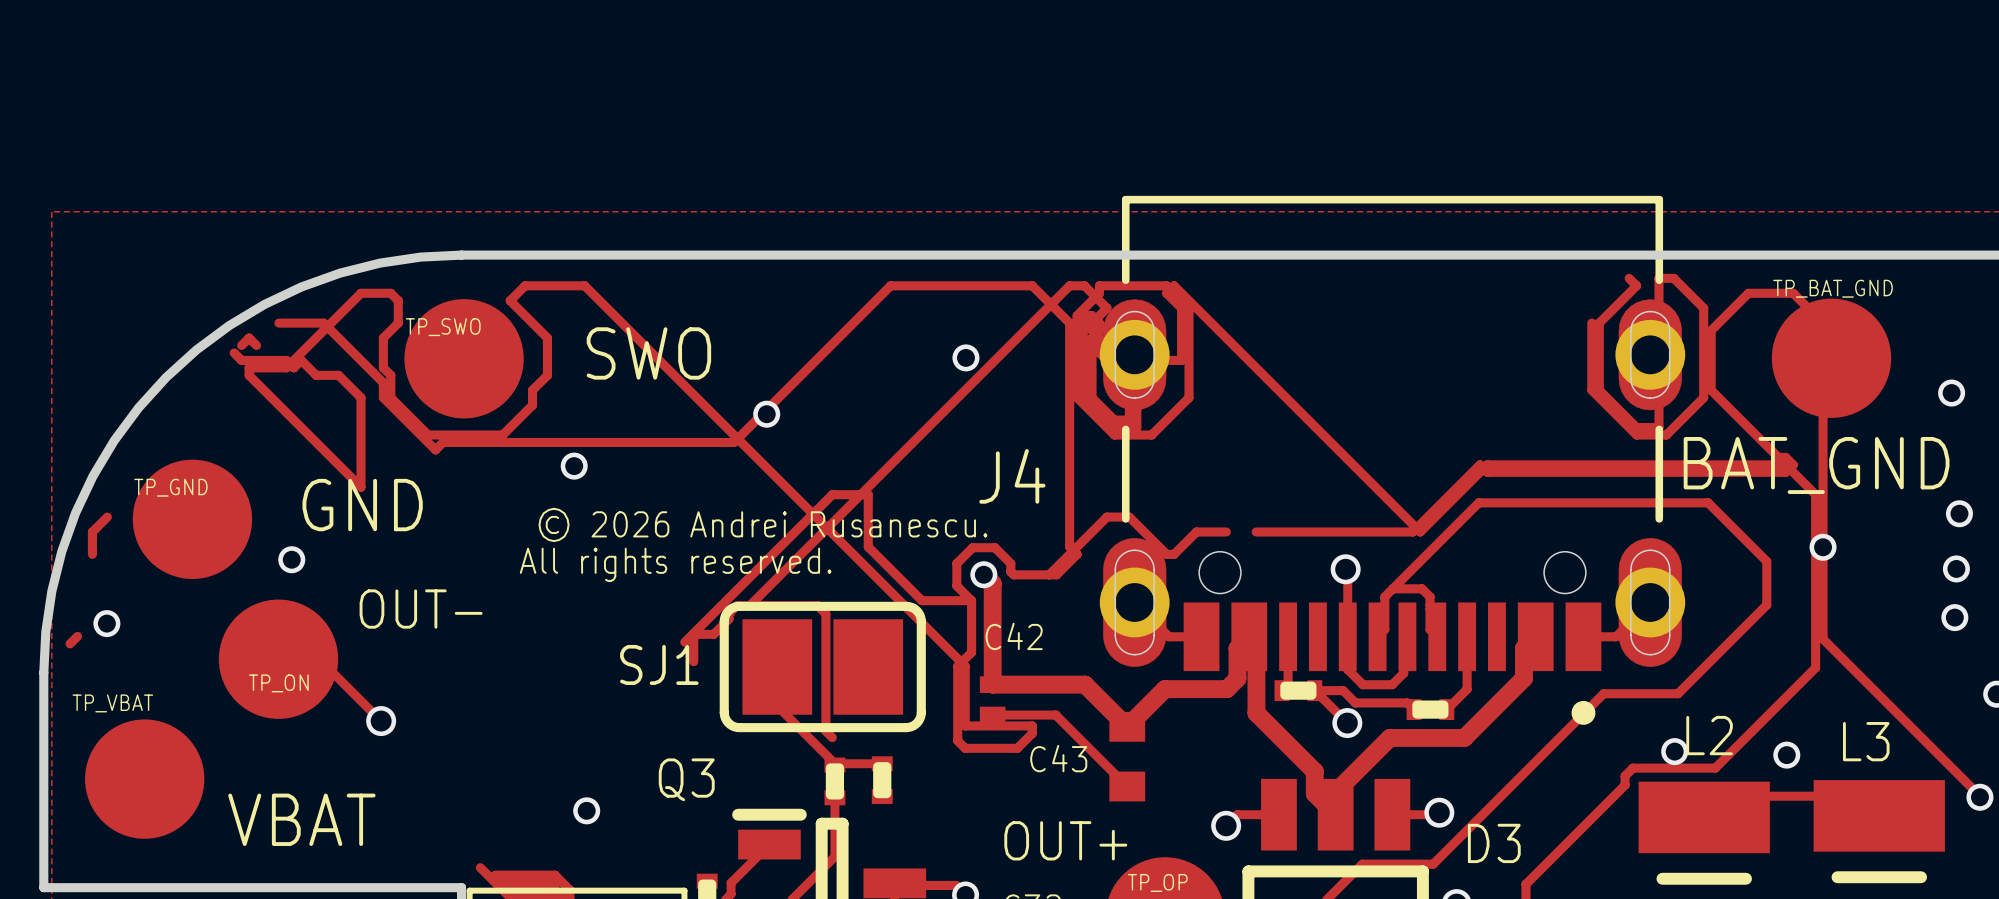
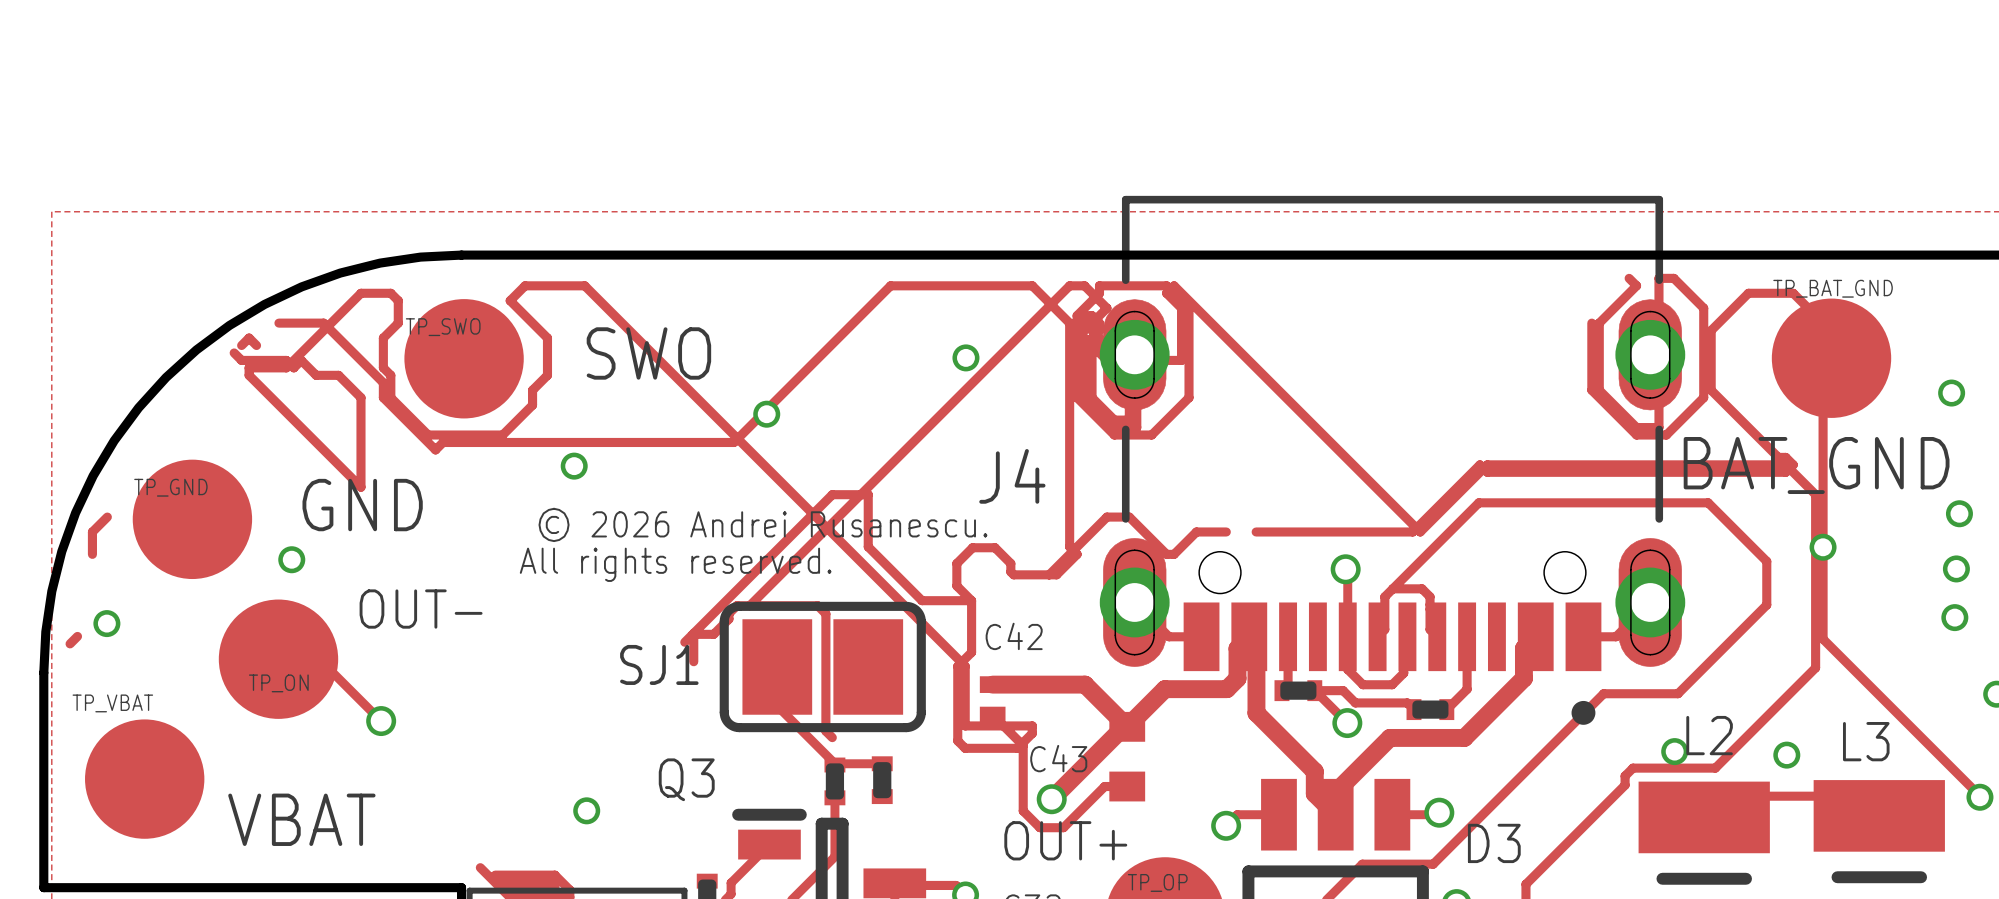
track: (983, 574) (992, 583) (992, 684) -> none
via: (983, 574) -> none
track: (992, 715) (1055, 715) (1127, 786) -> (992, 715) (1023, 745) (1023, 811) (1039, 827) (1063, 827) (1104, 786) (1127, 786)
track: none -> (1127, 726) (1124, 726) (1051, 799)
via: none -> (1051, 799)

